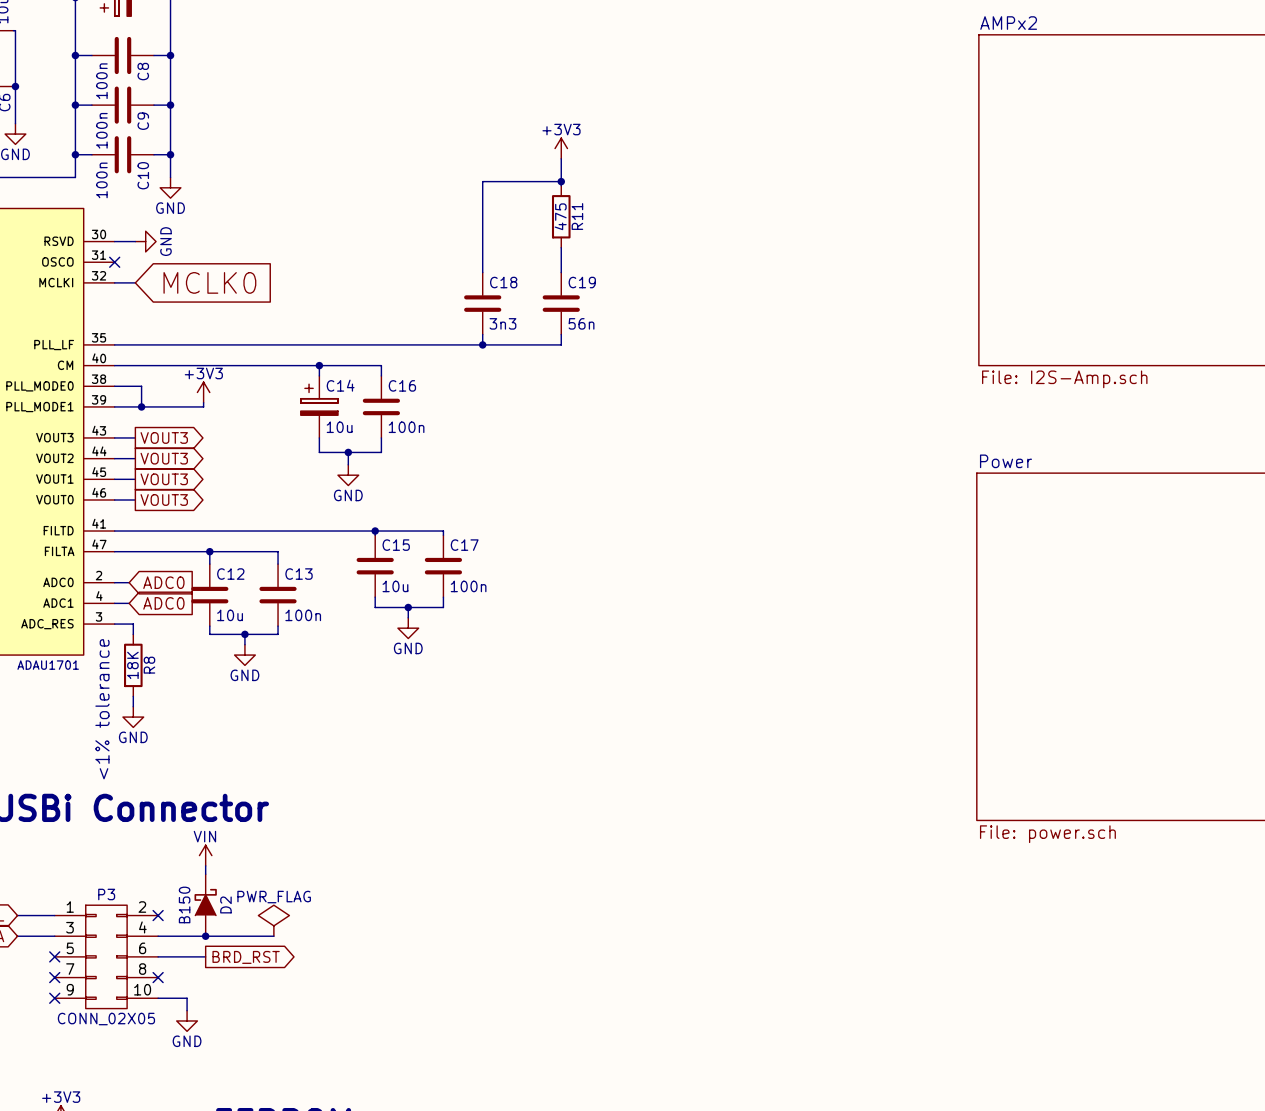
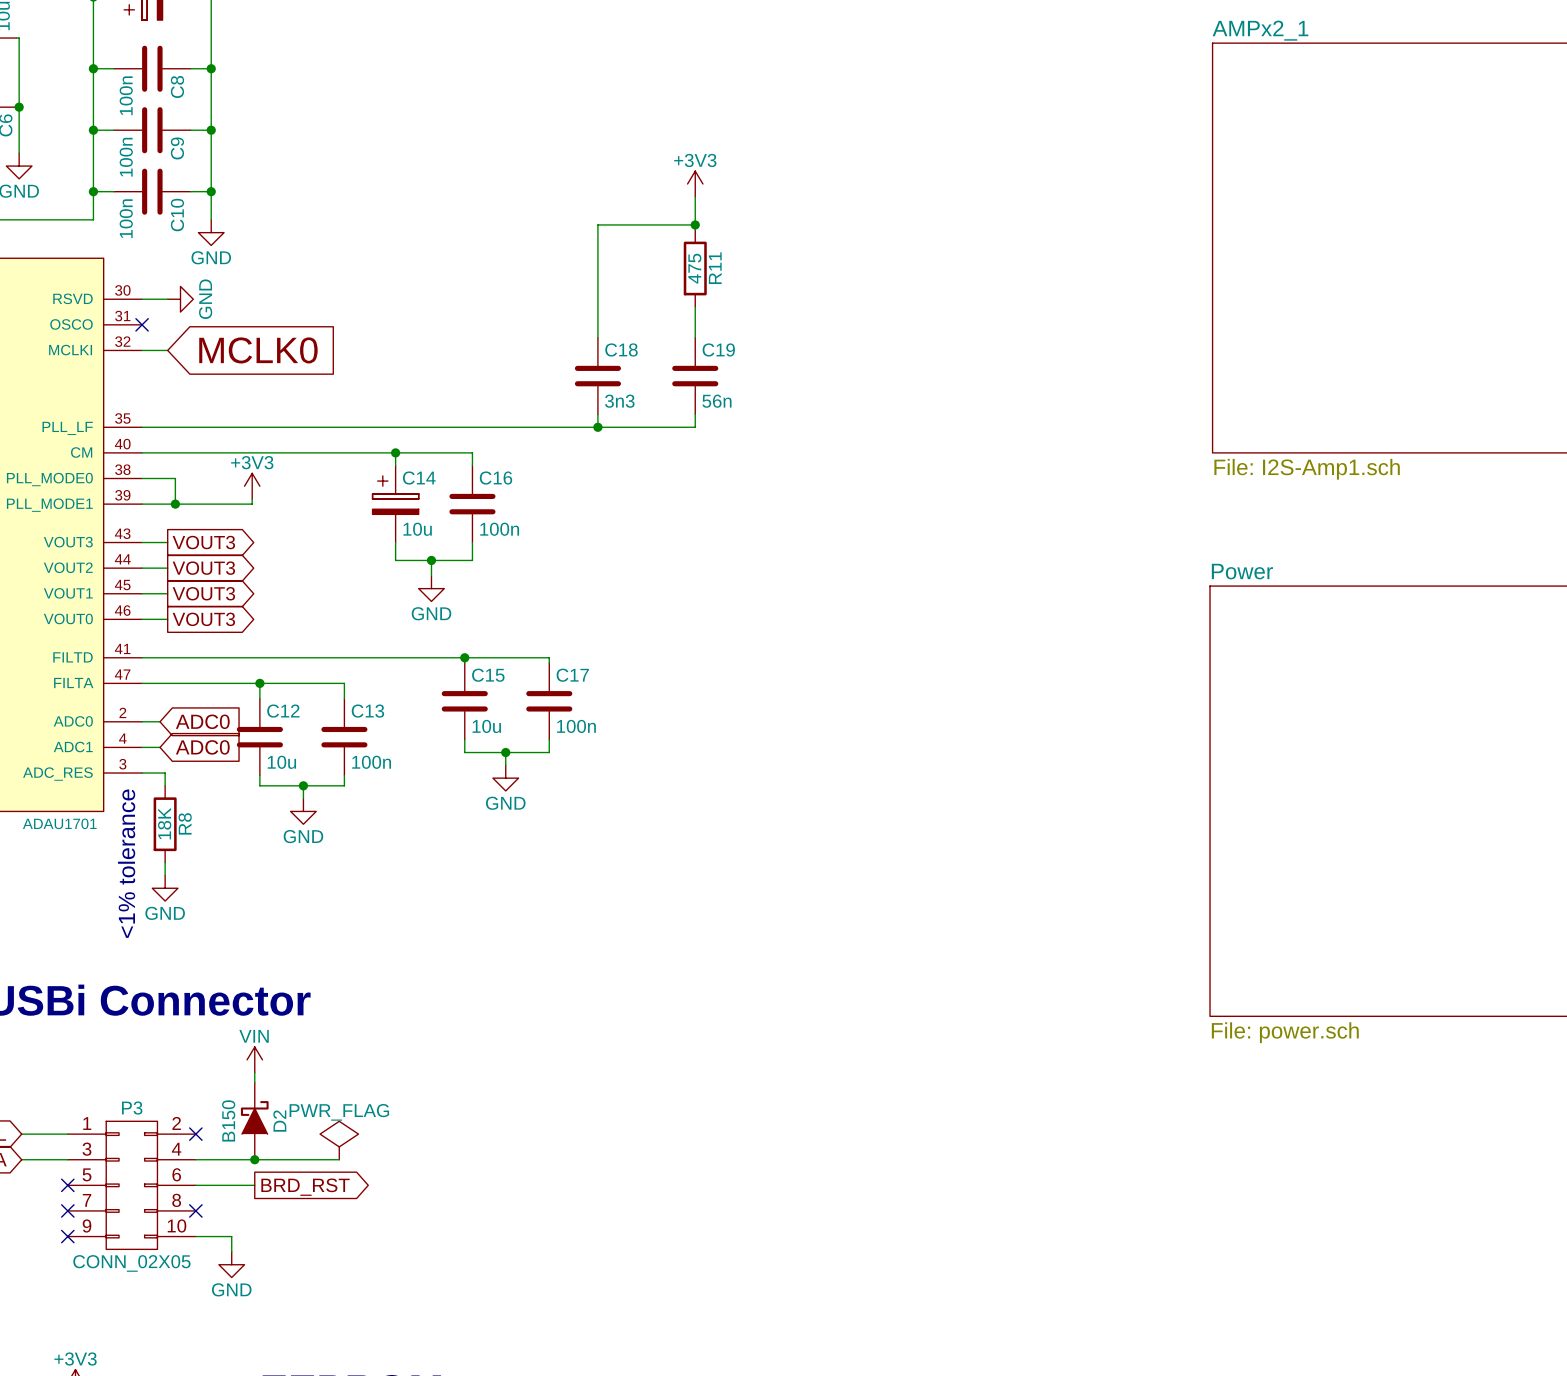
sheet AMPx2 name: AMPx2 (1008, 23) -> AMPx2_1 (1260, 30)
sheet AMPx2 value: File: I2S-Amp.sch (1064, 379) -> File: I2S-Amp1.sch (1307, 469)

